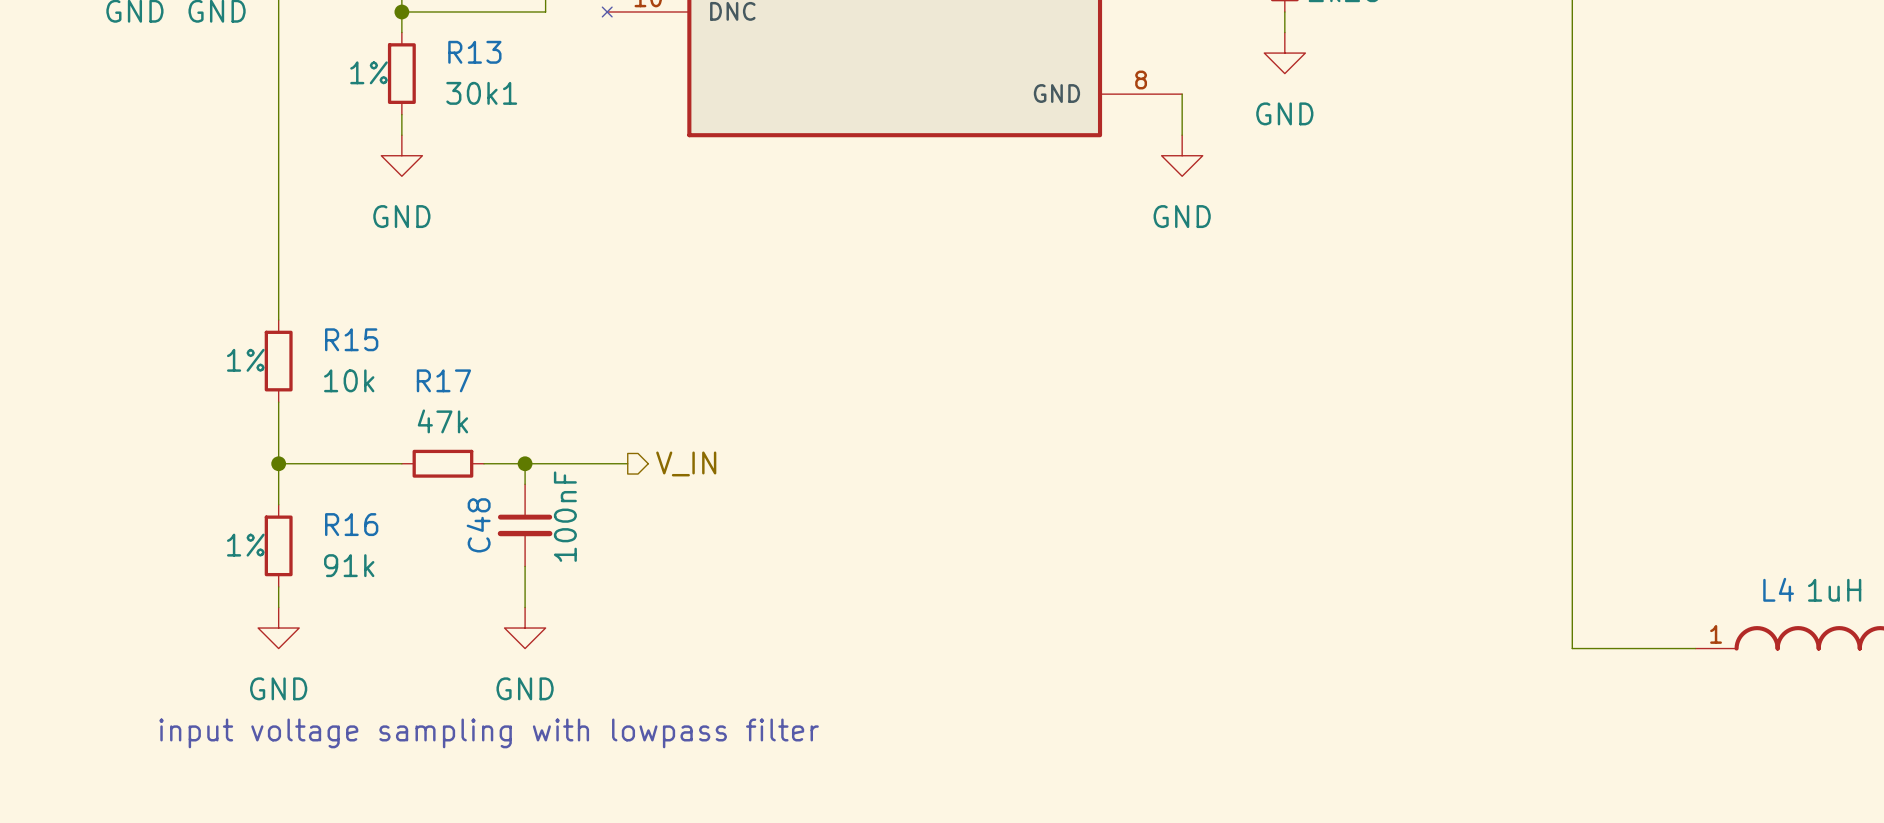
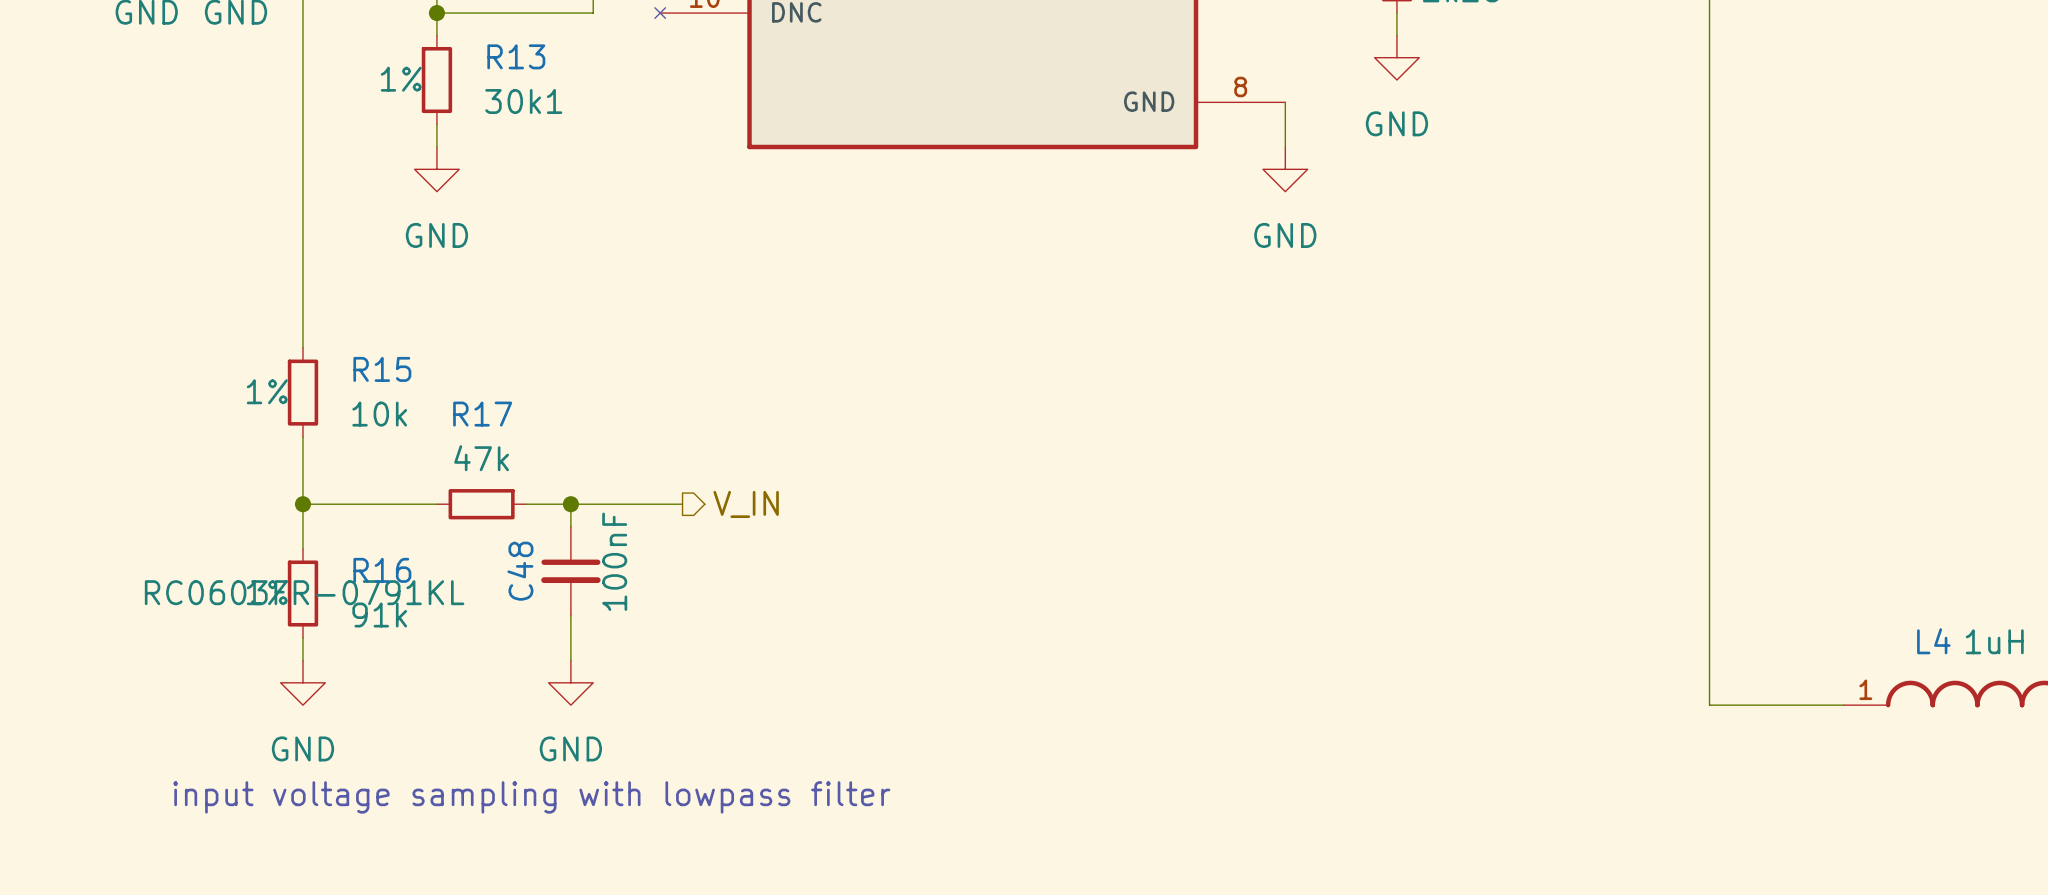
R16 text: none -> RC0603FR-0791KL (304, 592)

